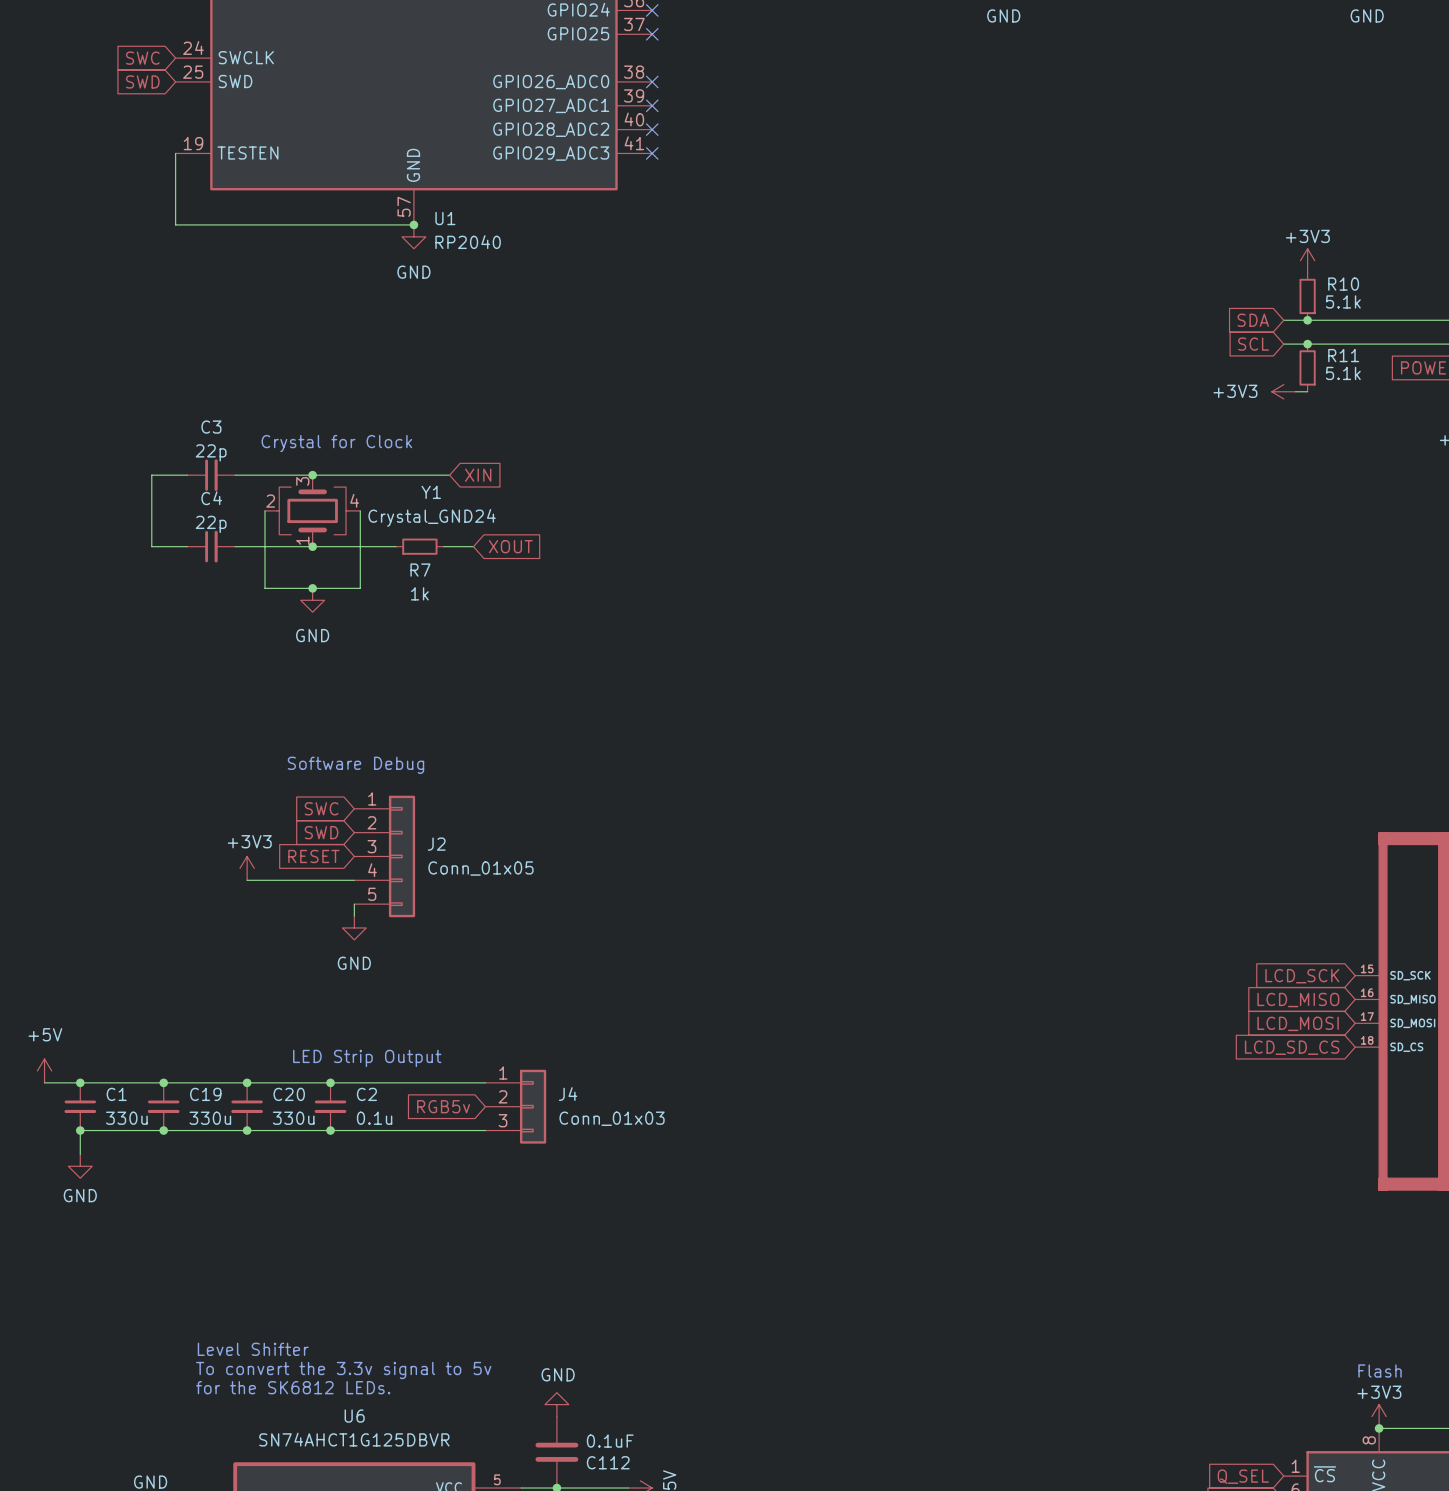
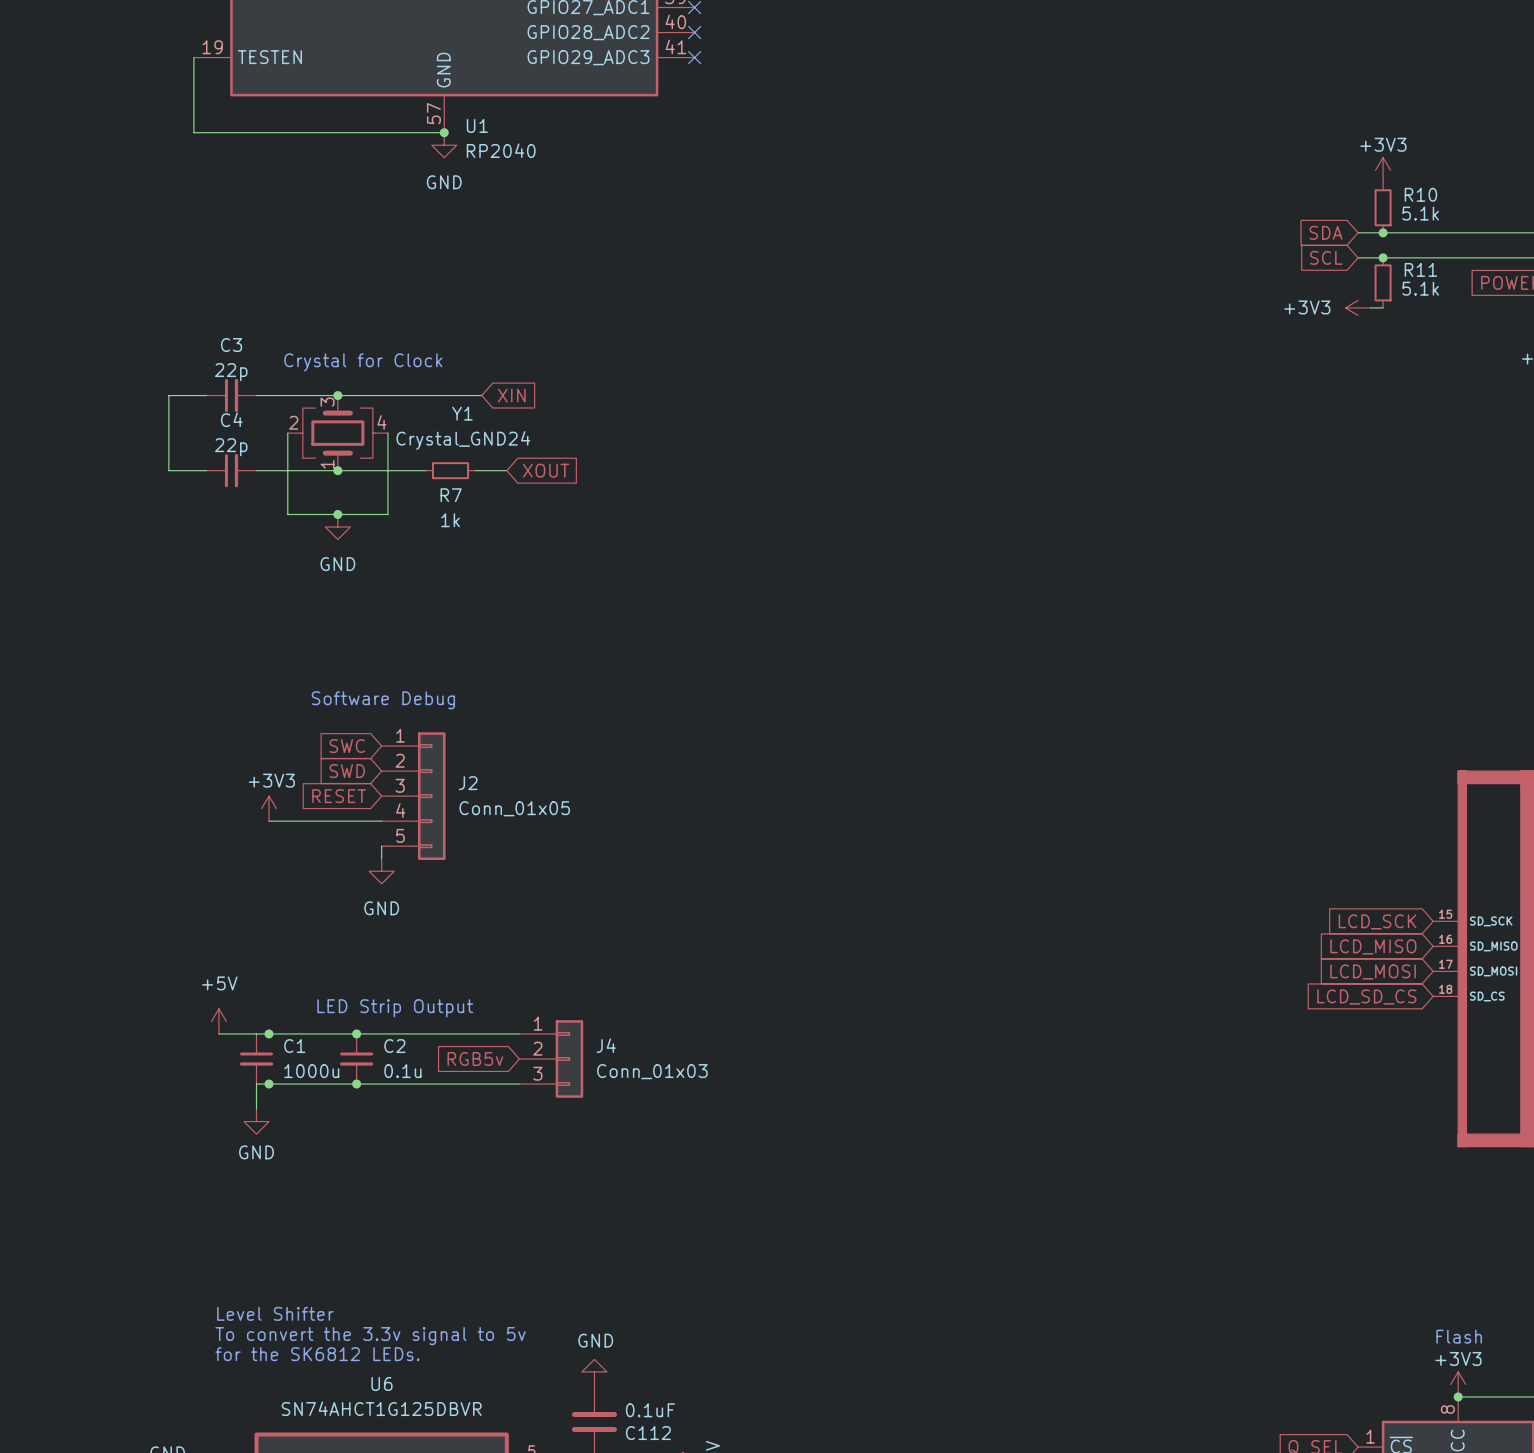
power symbol position: +5V (44, 1070) -> +5V (218, 1021)
wire: (44, 1082) (199, 1082) -> none
junction: (80, 1082) -> none
junction: (163, 1082) -> none
C1 position: (80, 1106) -> (256, 1058)
C19: 330u (163, 1106) -> none
C20: 330u (247, 1106) -> none
C1 value: 330u (126, 1118) -> 1000u (311, 1071)
junction: (80, 1130) -> none
junction: (163, 1130) -> none
wire: (235, 1130) (80, 1130) (80, 1154) -> (256, 1084) (256, 1109)
power symbol position: GND (80, 1166) -> GND (256, 1121)

